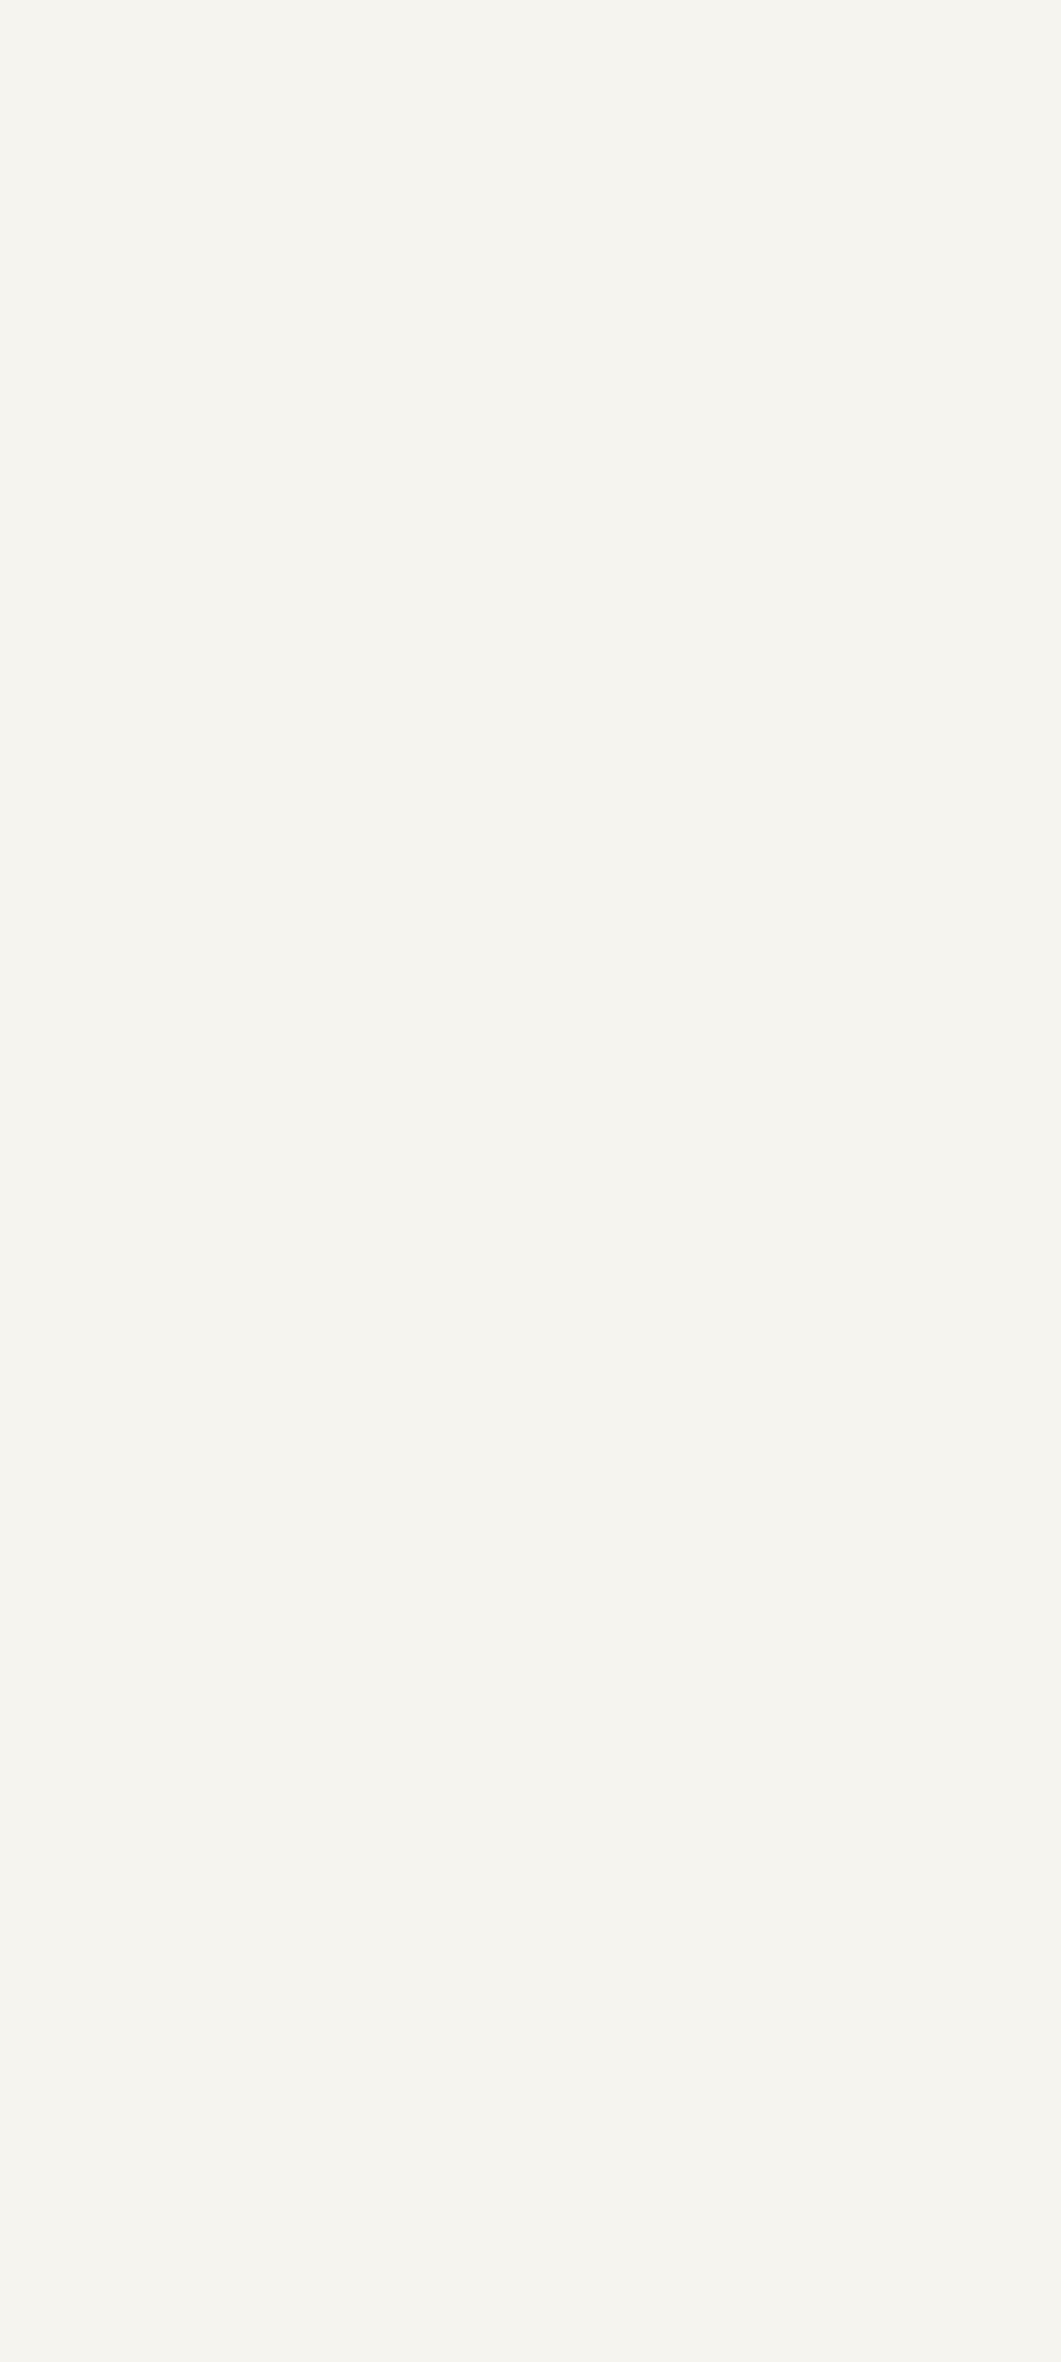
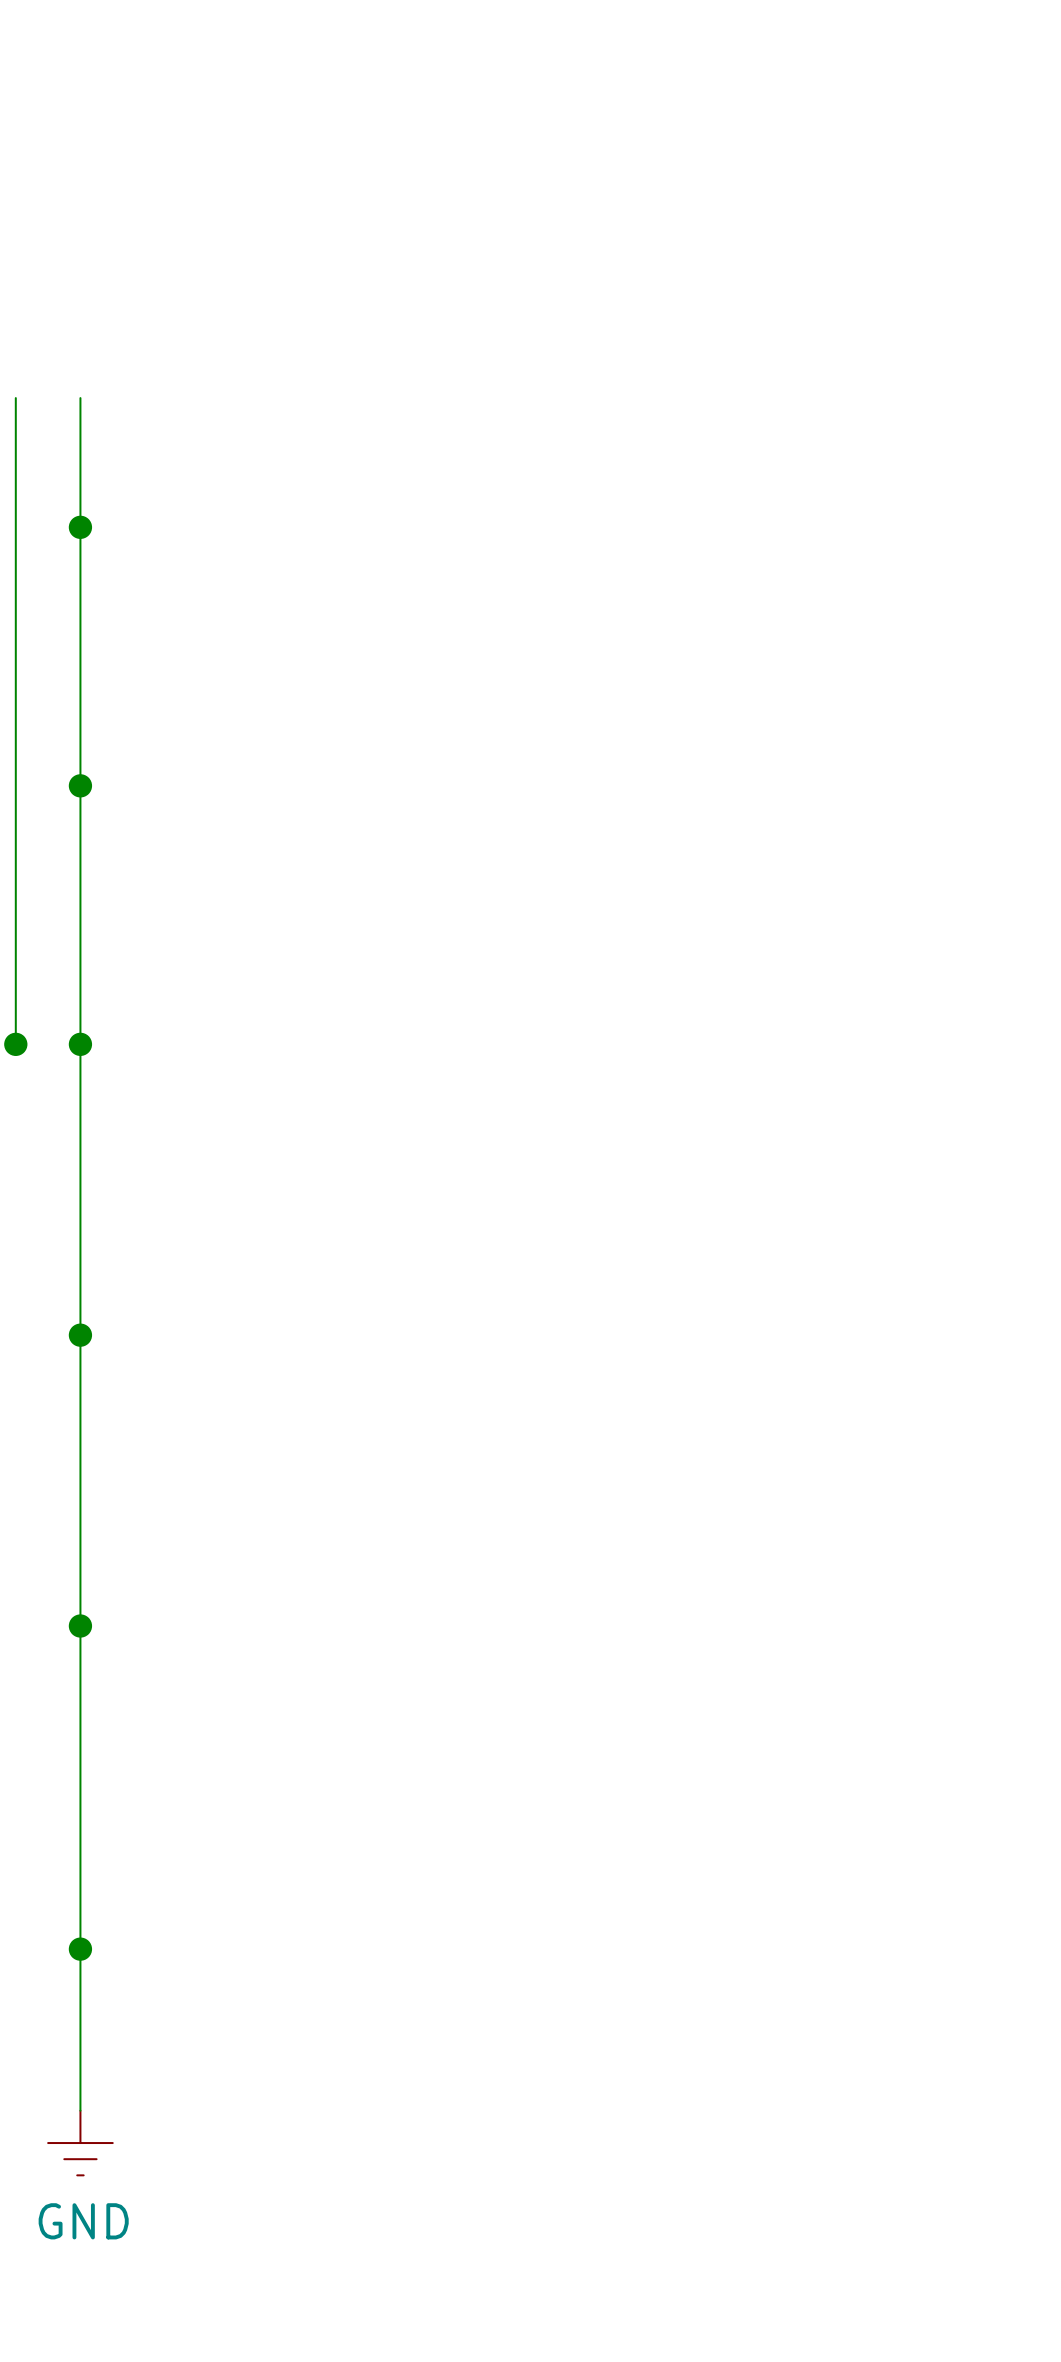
wire: none -> (15, 398) (15, 1044)
wire: none -> (80, 398) (80, 2110)
junction: none -> (80, 527)
junction: none -> (80, 785)
junction: none -> (15, 1044)
junction: none -> (80, 1044)
junction: none -> (80, 1335)
junction: none -> (80, 1626)
junction: none -> (80, 1949)
power symbol: none -> GND (80, 2143)

